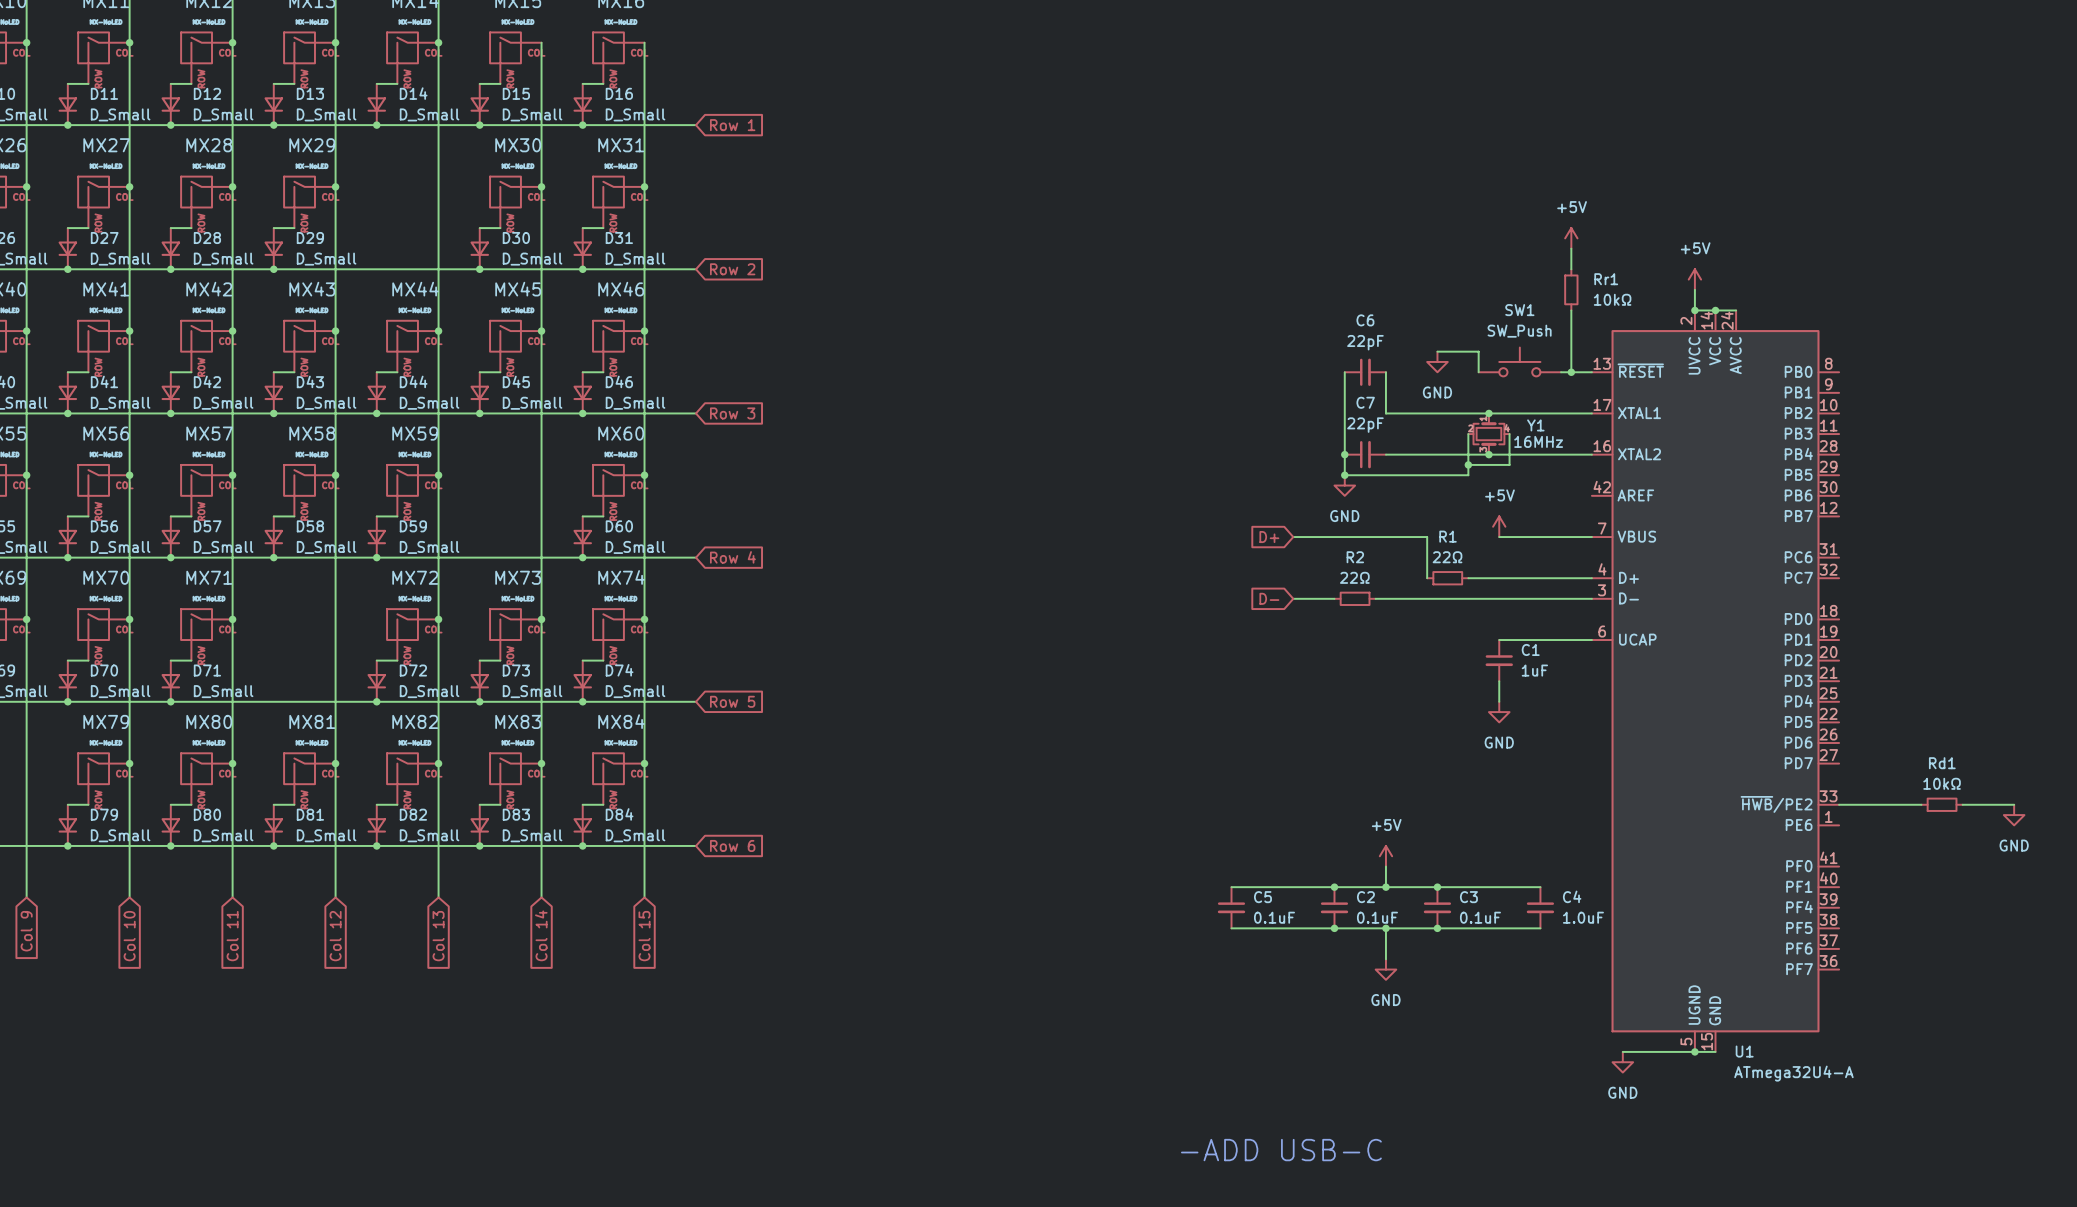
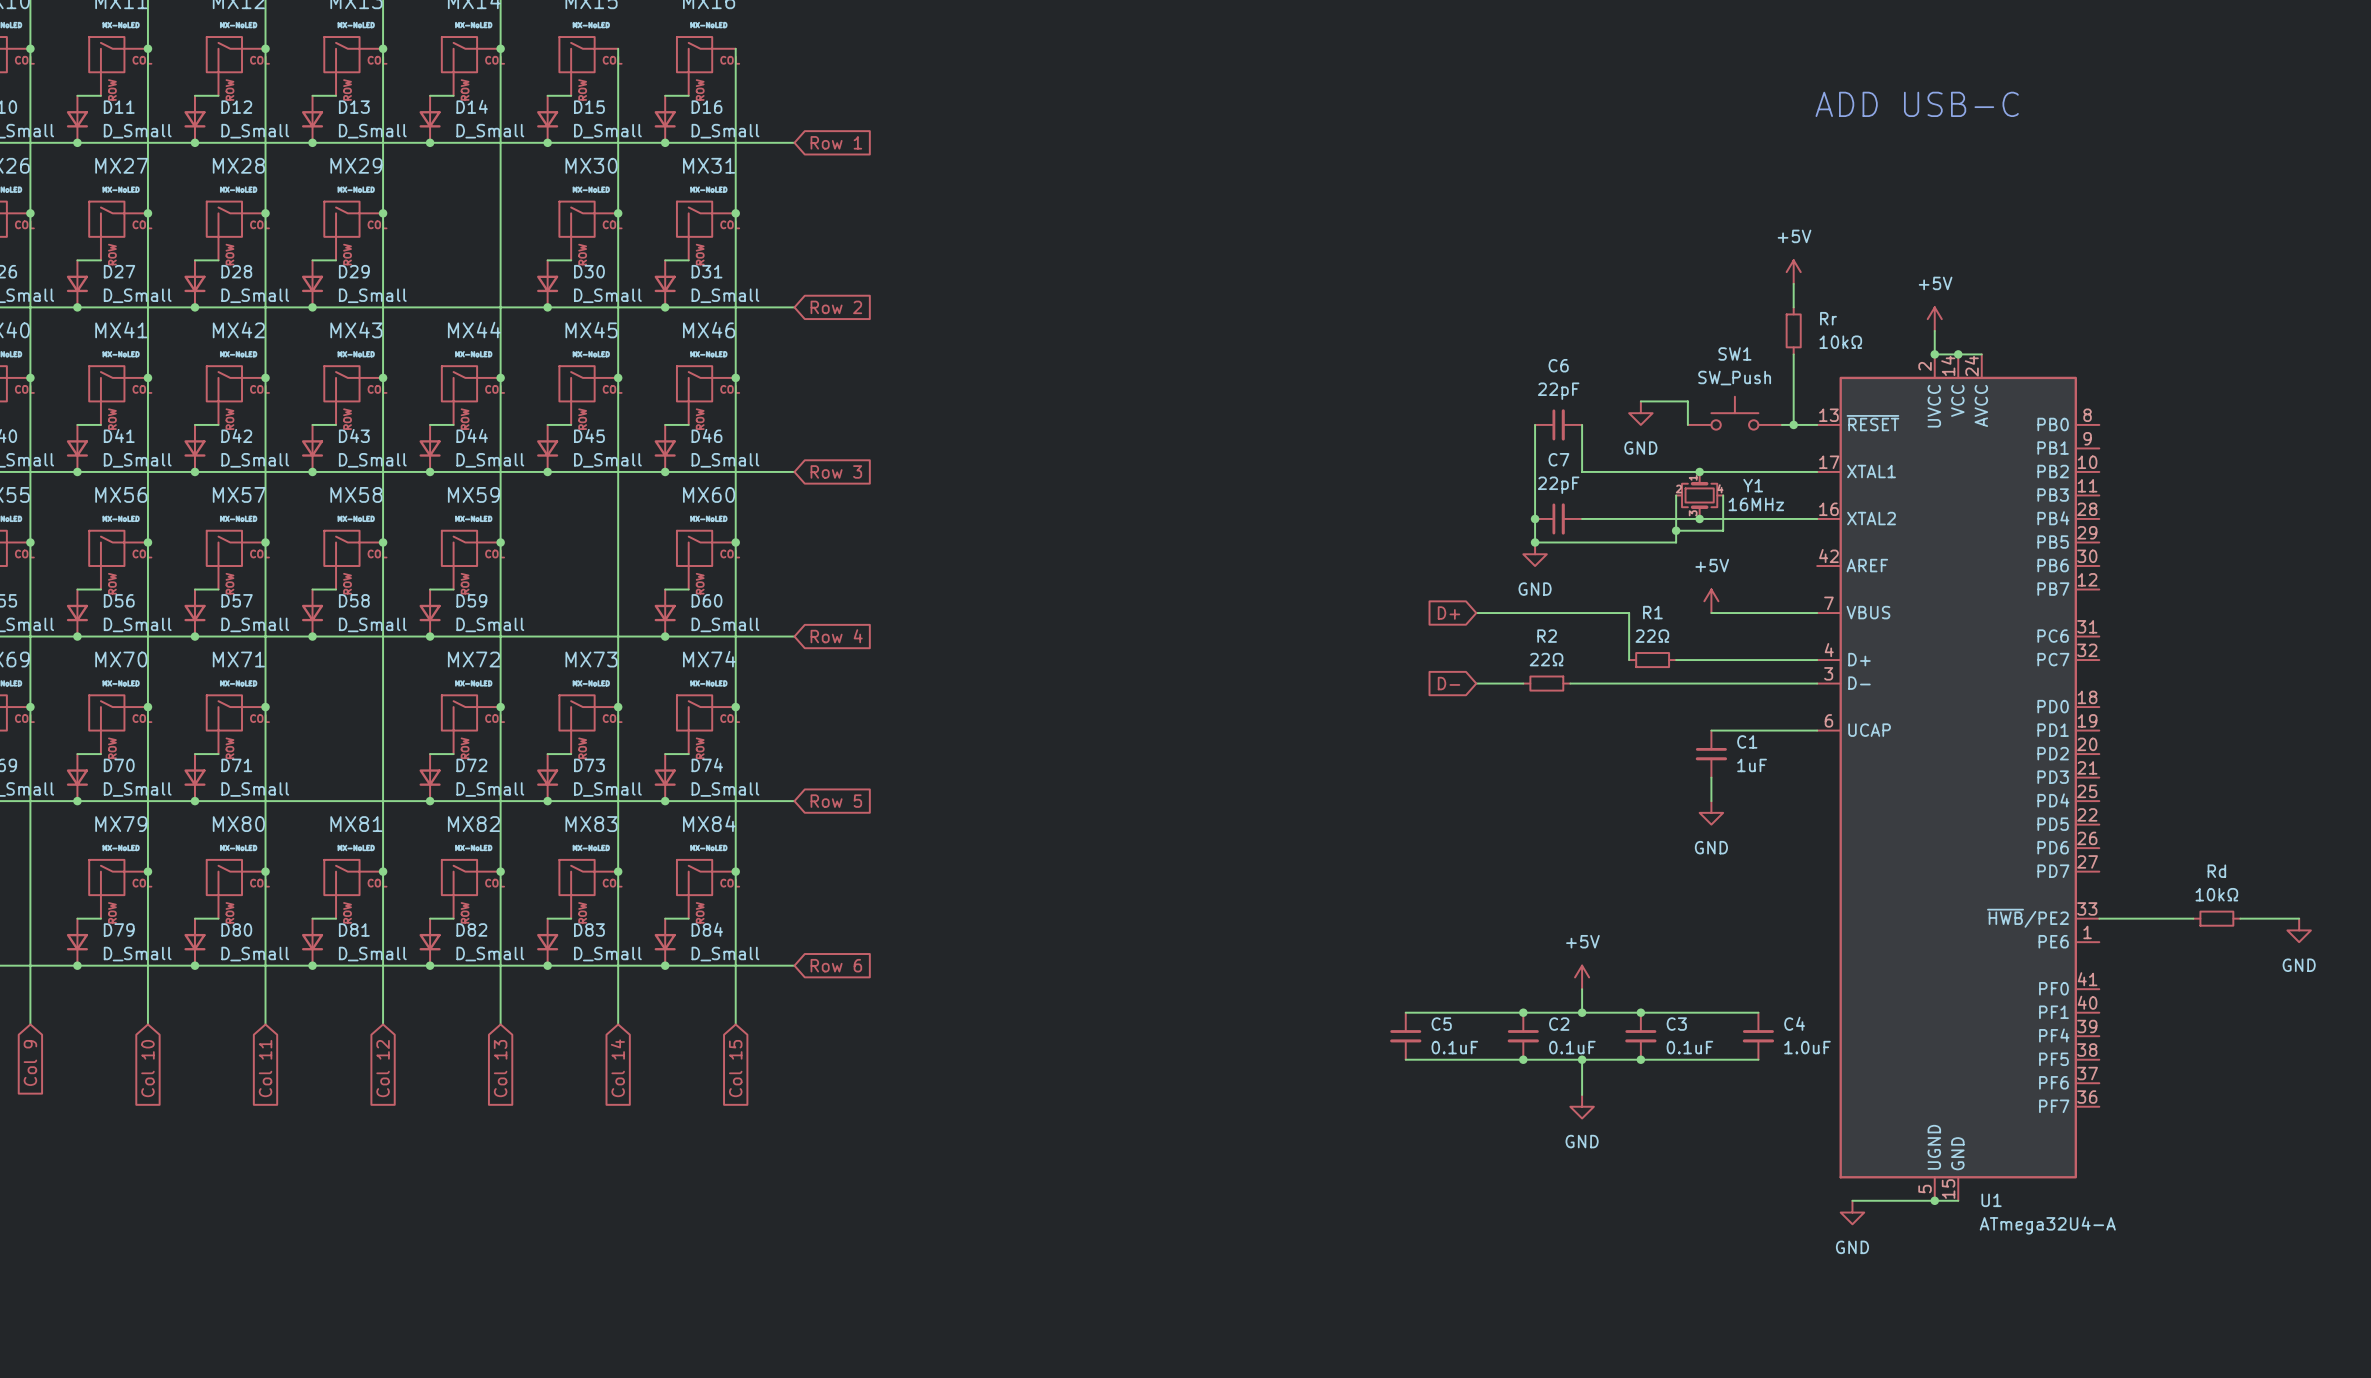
text: none -> ADD USB-C (1917, 104)
Rr1 name: Rr1 (1606, 279) -> Rr (1828, 318)
Rd1 name: Rd1 (1942, 763) -> Rd (2216, 871)
text: -ADD USB-C (1281, 1150) -> none

